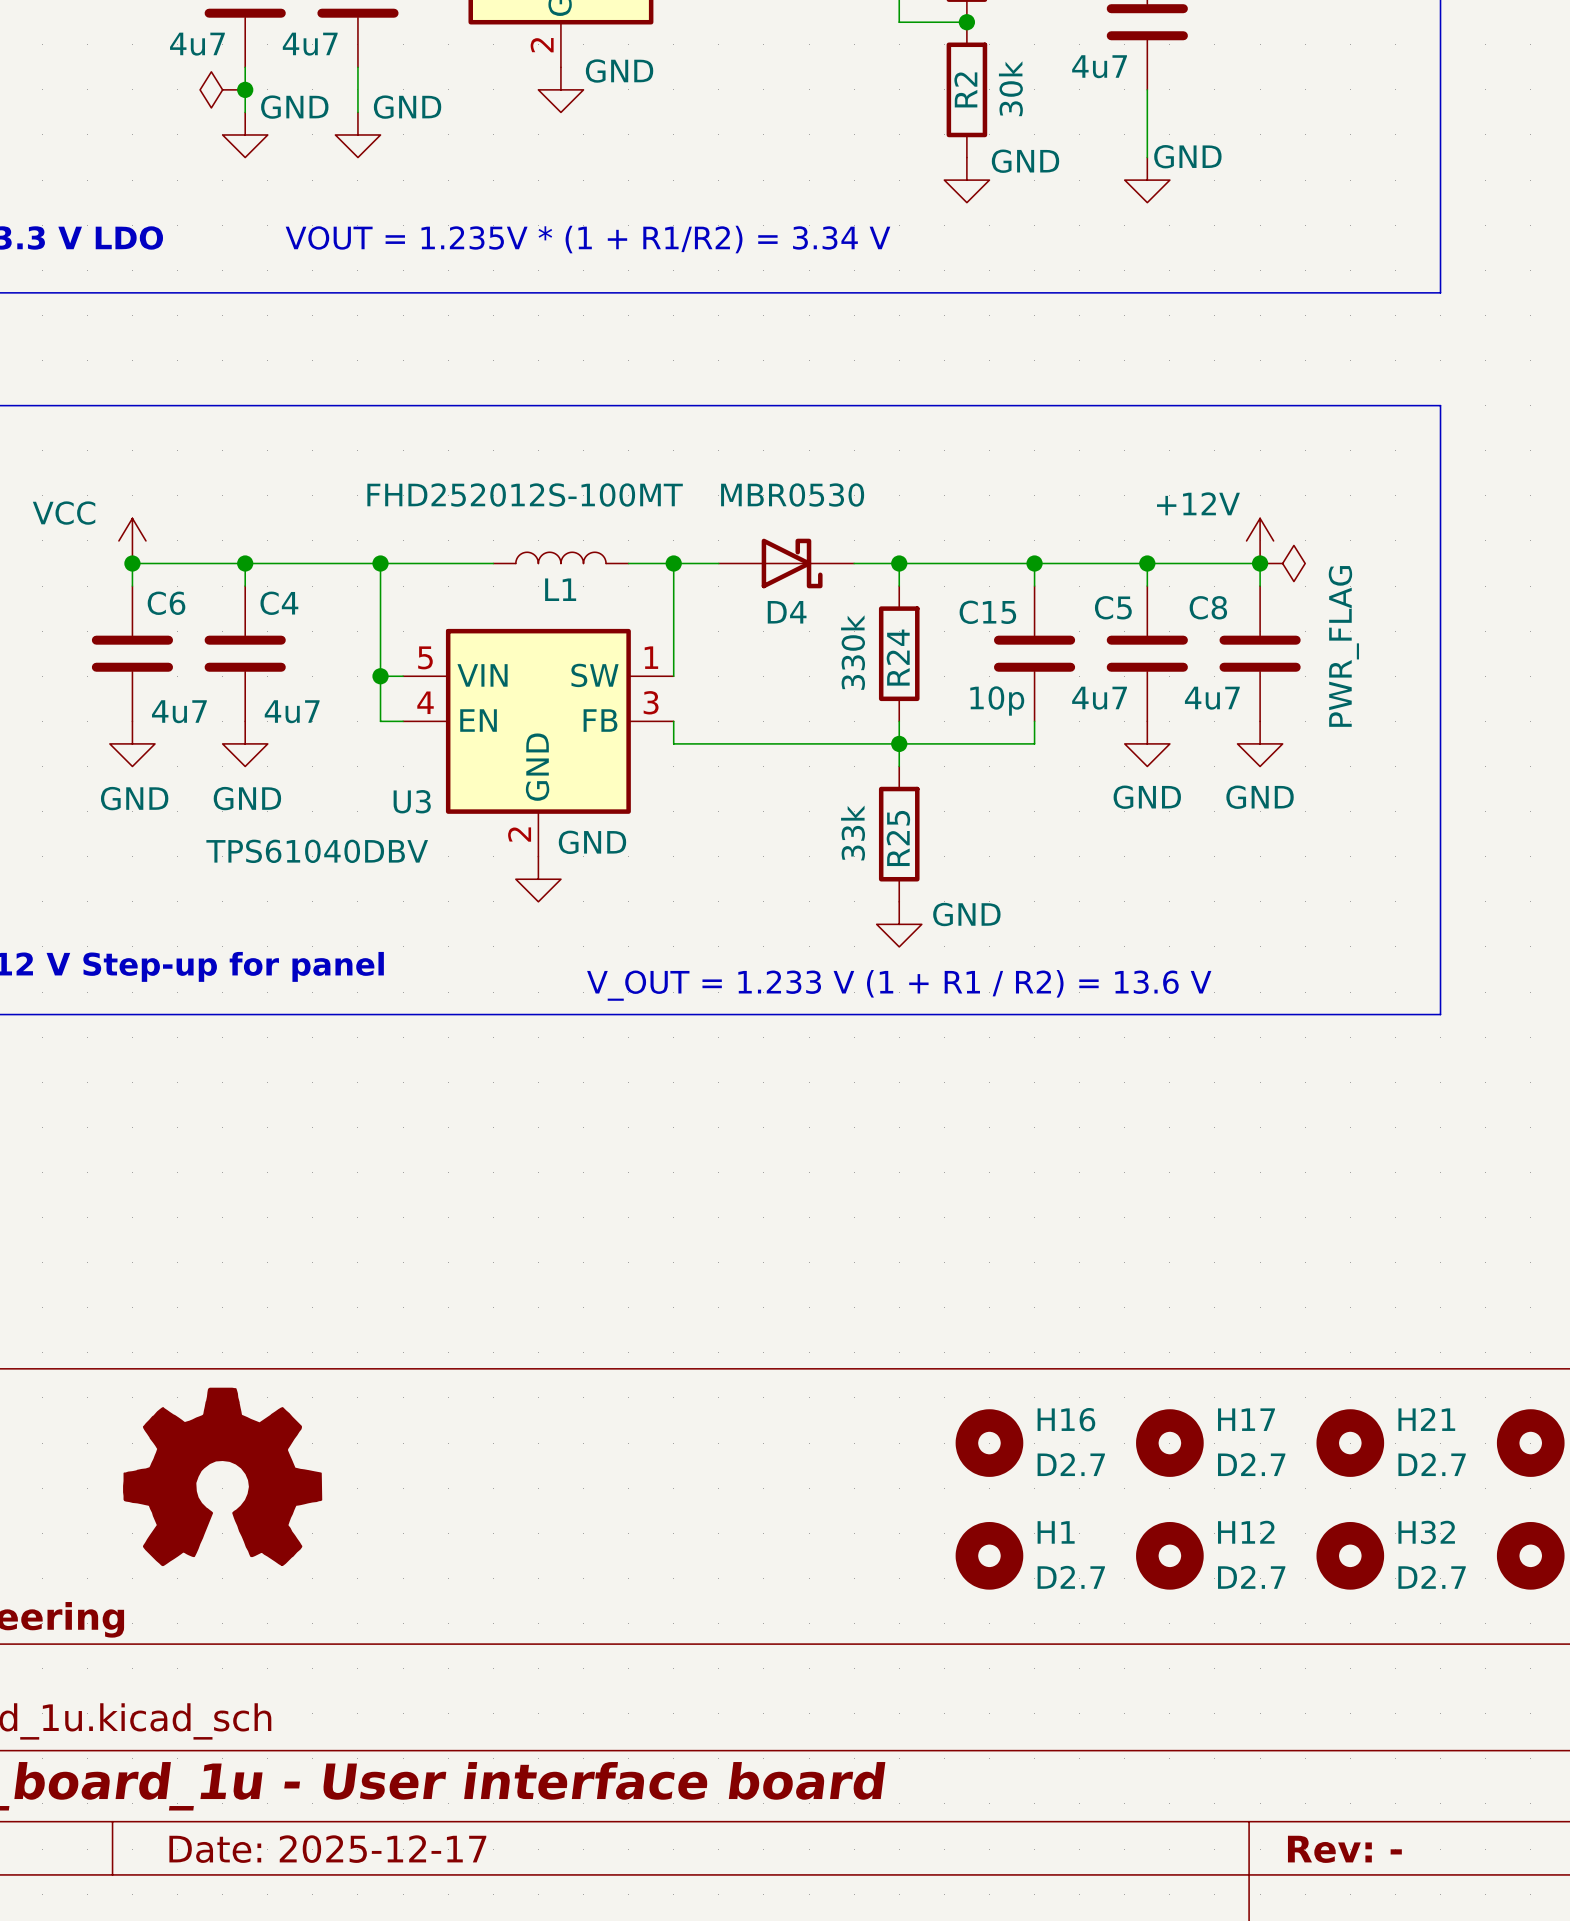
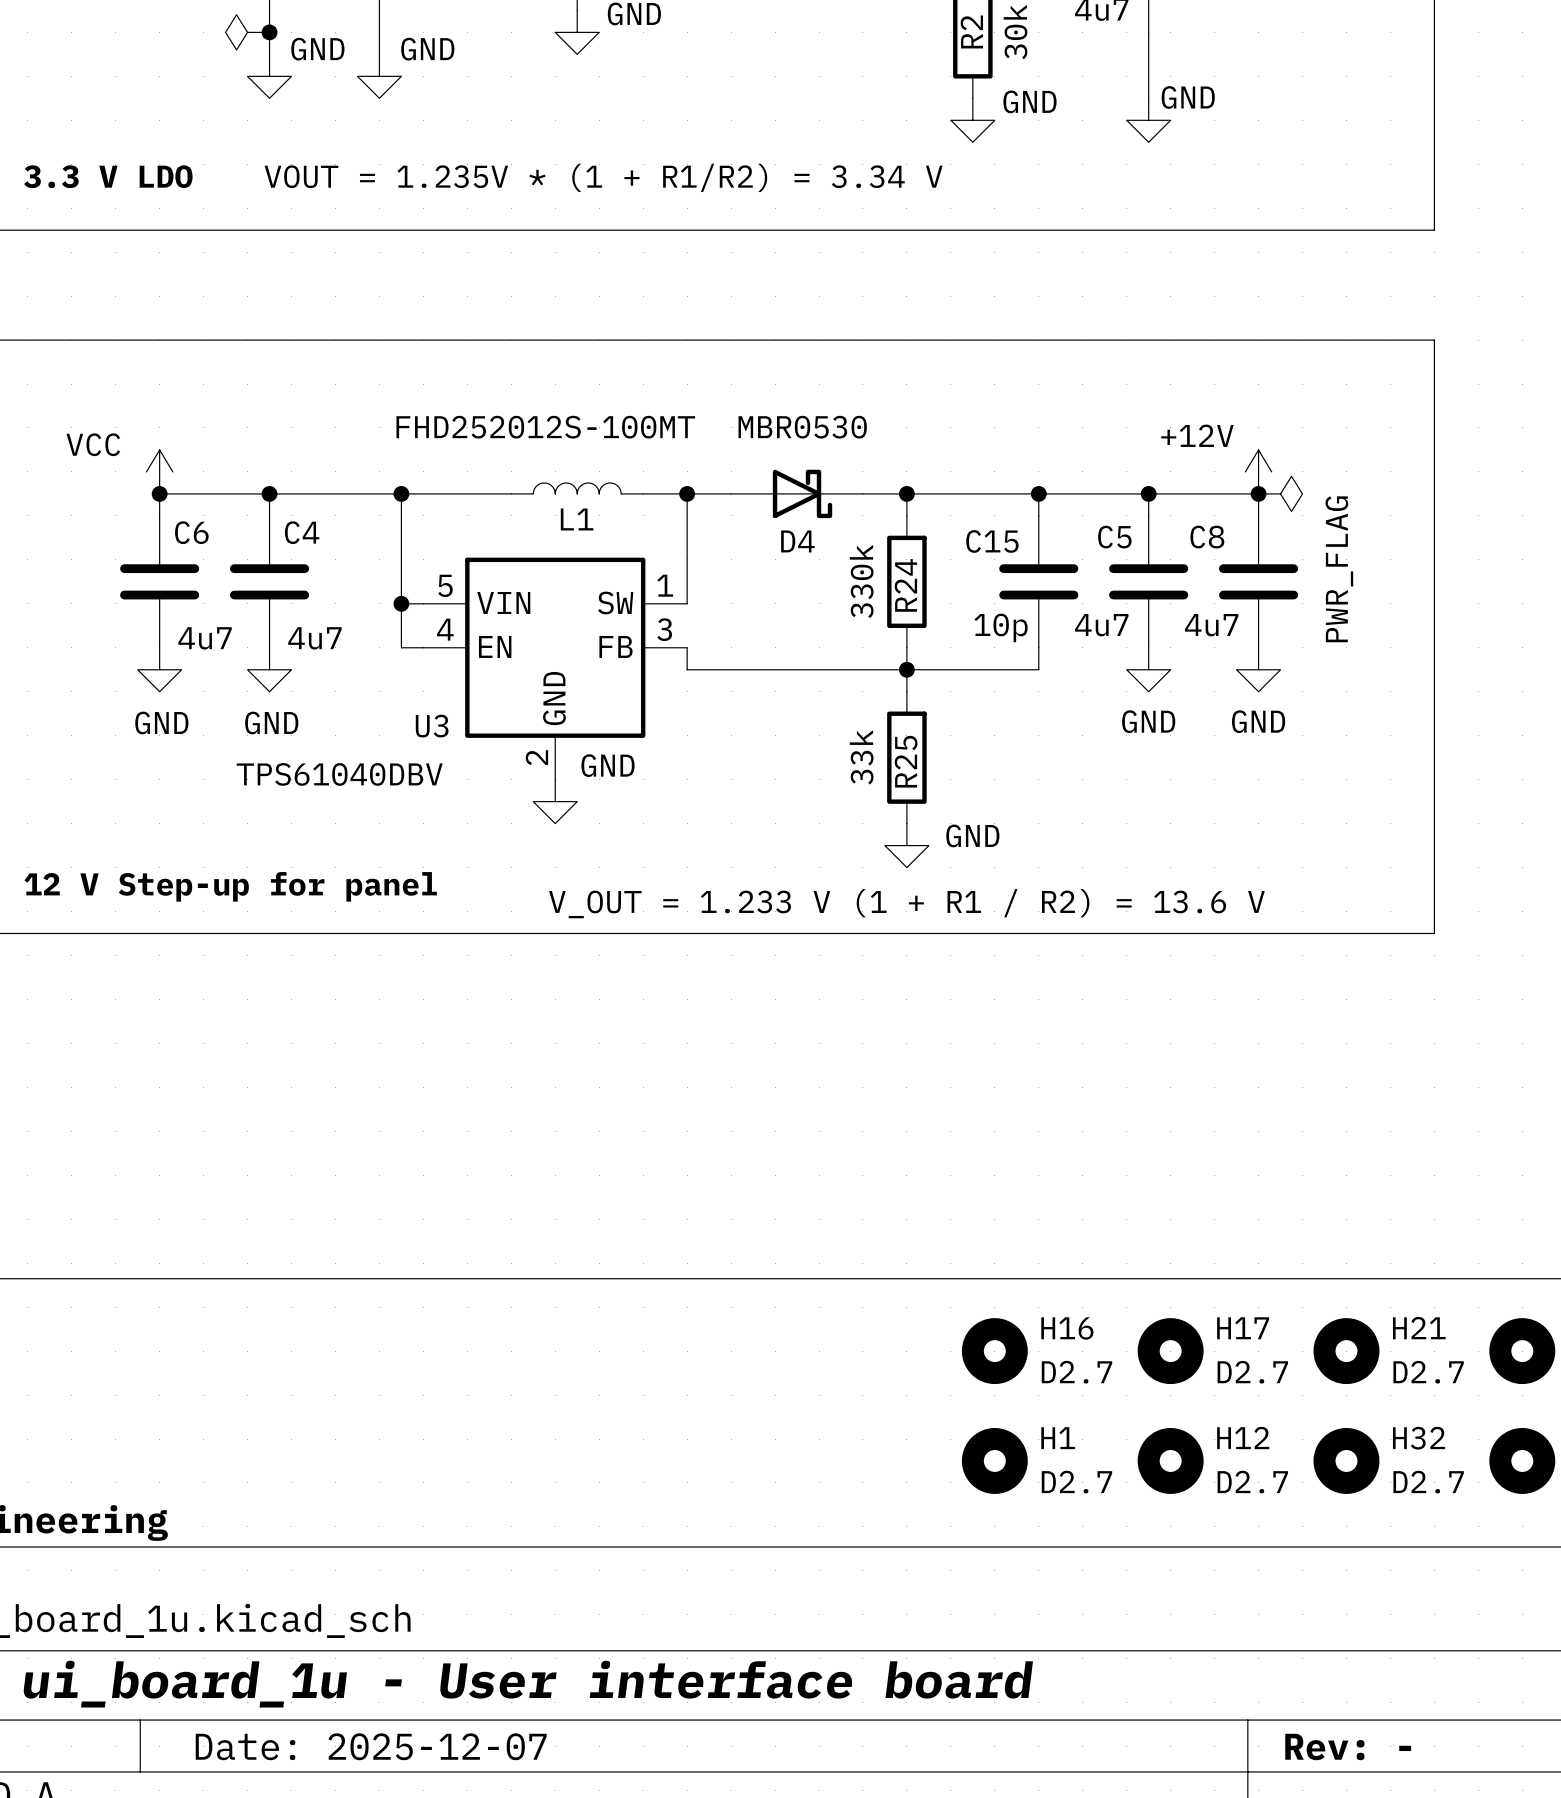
power symbol: (222, 1476) -> none
title block: Date: 2025-12-17 (327, 1849) -> Date: 2025-12-07 (371, 1746)

